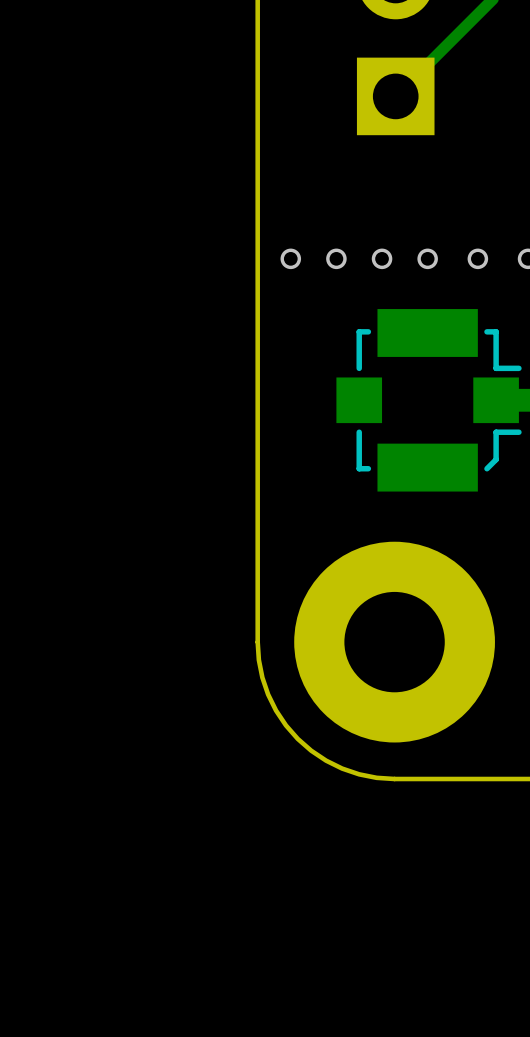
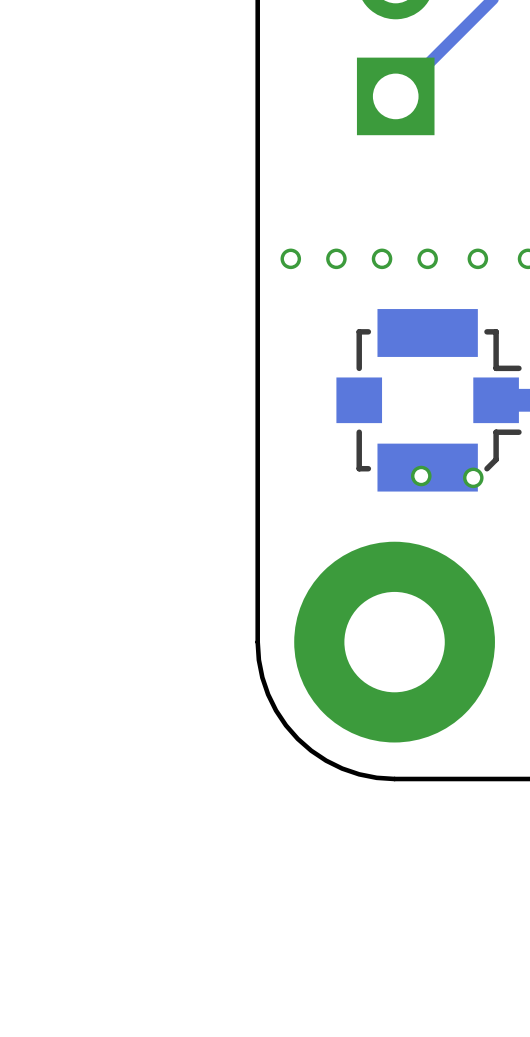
via: none -> (421, 476)
via: none -> (473, 477)

